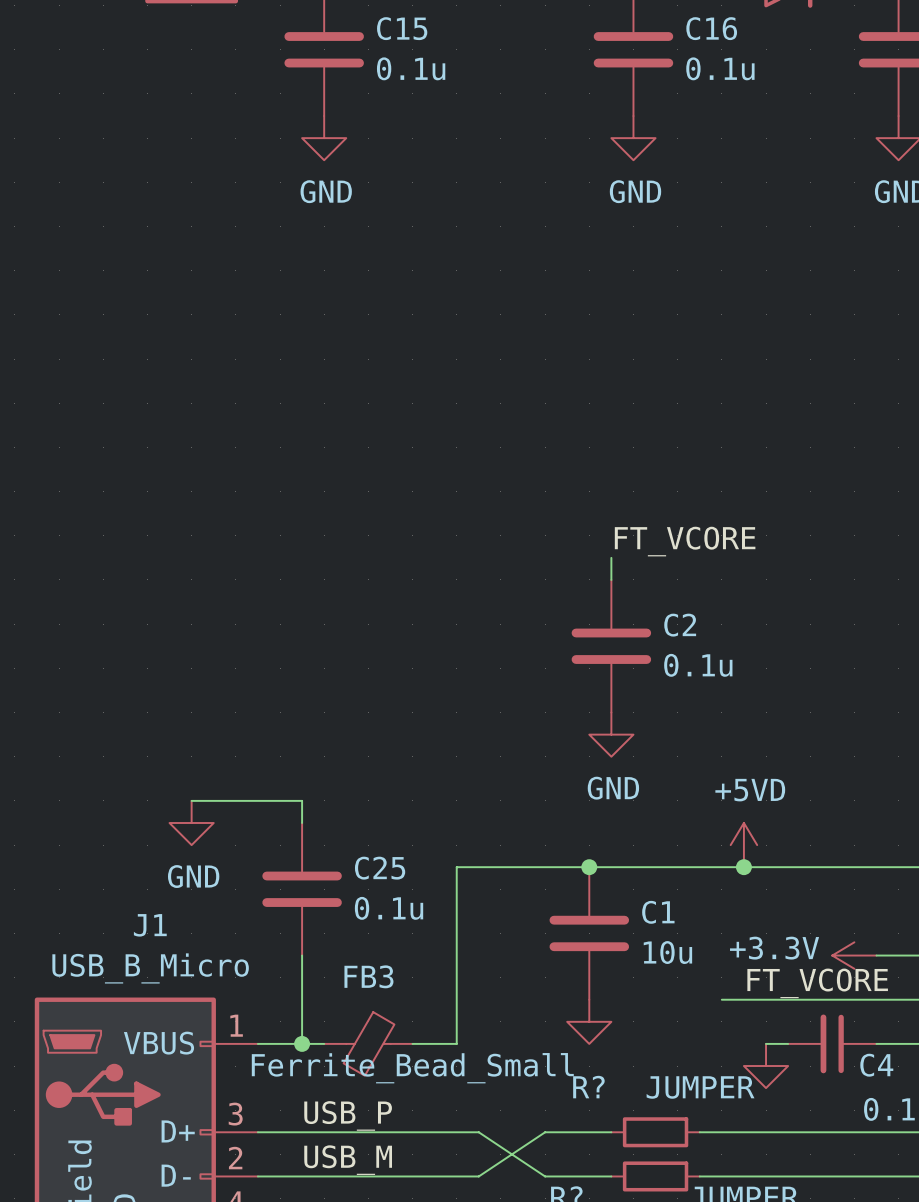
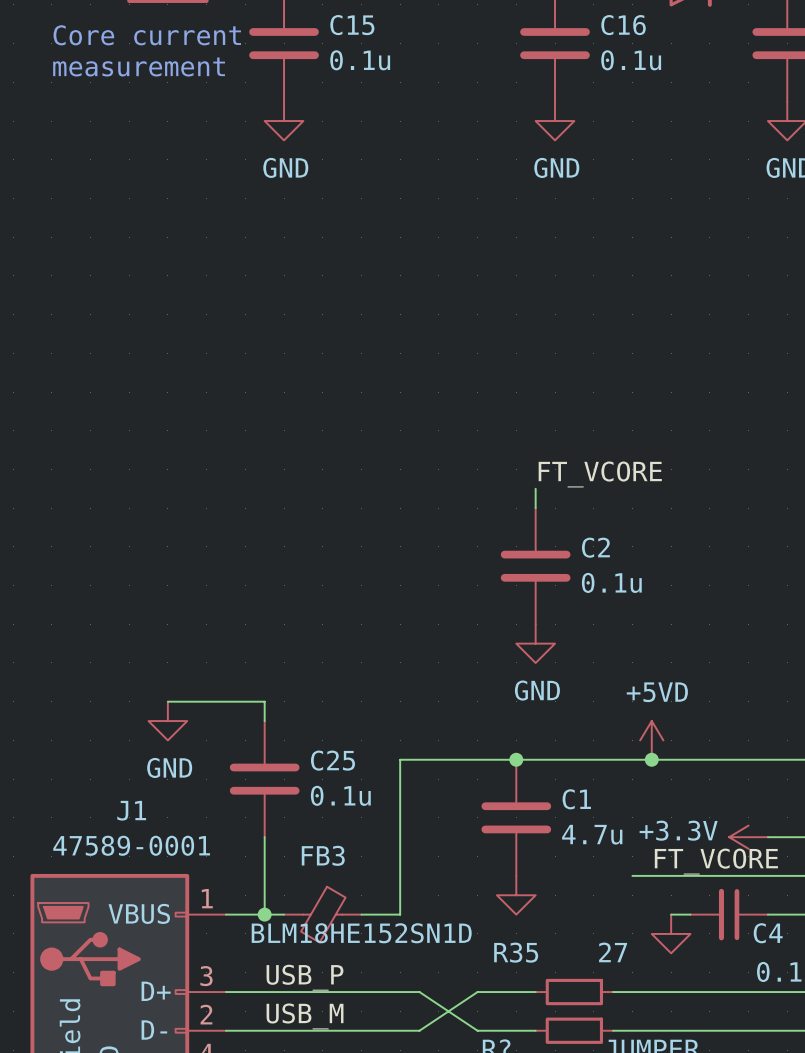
text: none -> Core current (147, 35)
text: none -> measurement (139, 67)
C1 value: 10u (667, 952) -> 4.7u (592, 834)
J1 value: USB_B_Micro (150, 968) -> 47589-0001 (131, 845)
FB3 value: Ferrite_Bead_Small (412, 1068) -> BLM18HE152SN1D (361, 933)
R? name: R? (588, 1087) -> R35 (516, 952)
R? value: JUMPER (700, 1087) -> 27 (613, 952)

